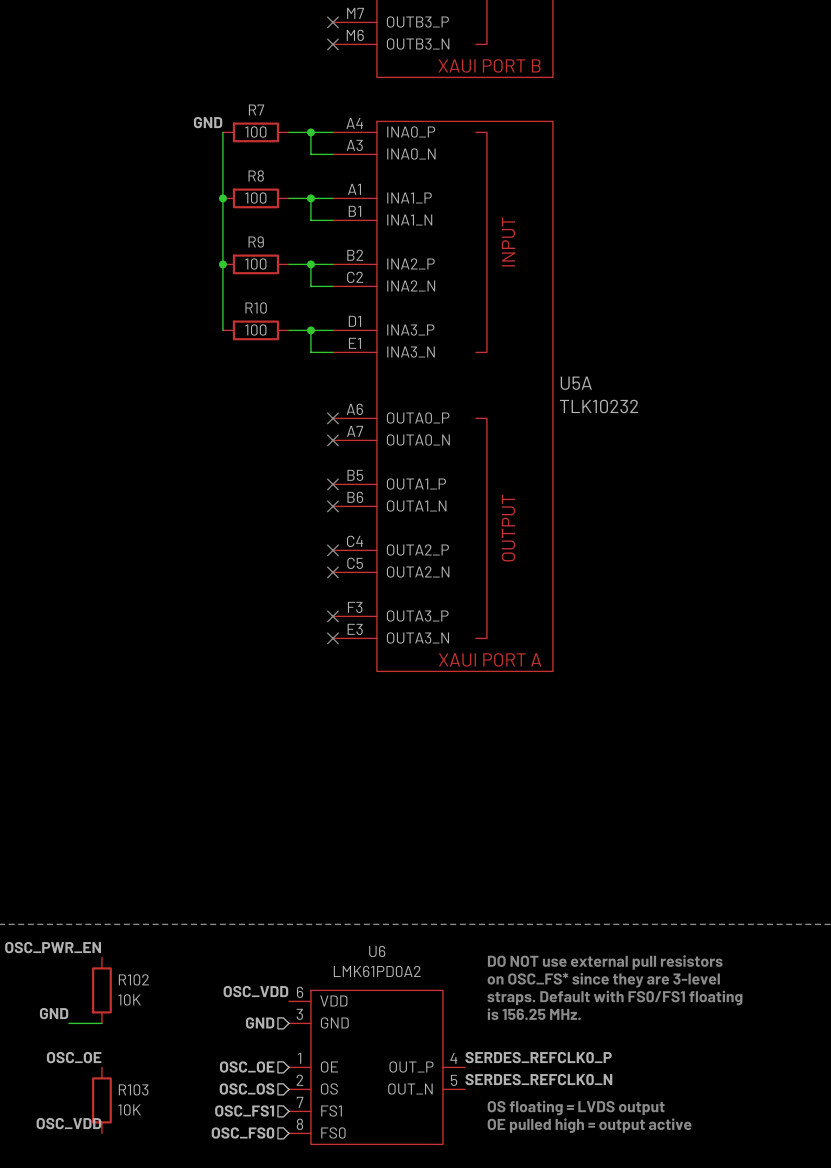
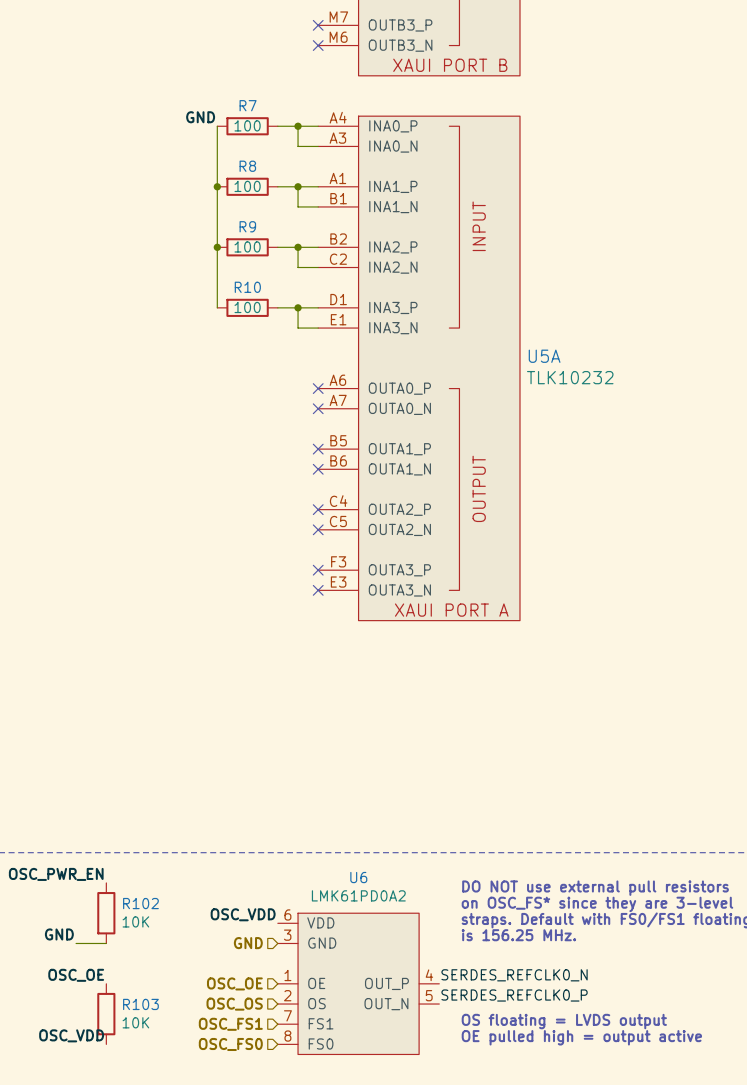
label: SERDES_REFCLK0_P (538, 1057) -> SERDES_REFCLK0_N (514, 975)
label: SERDES_REFCLK0_N (538, 1079) -> SERDES_REFCLK0_P (514, 995)

